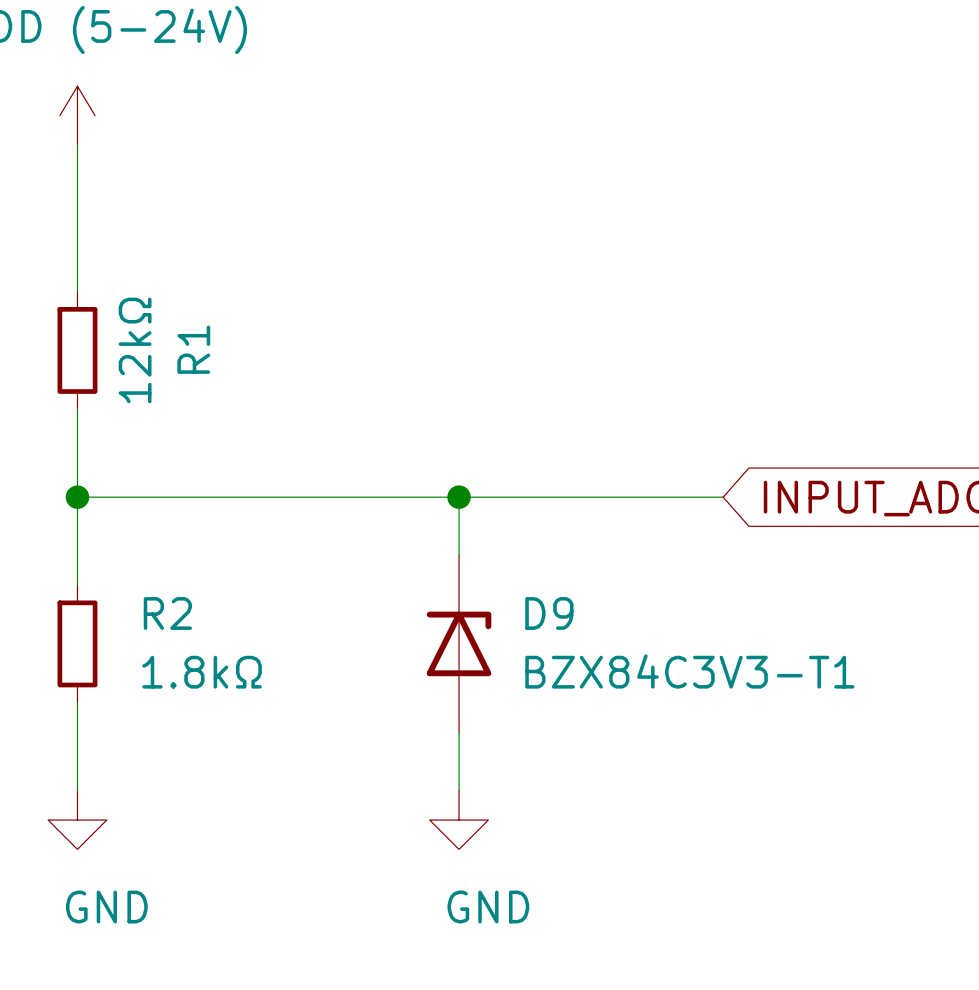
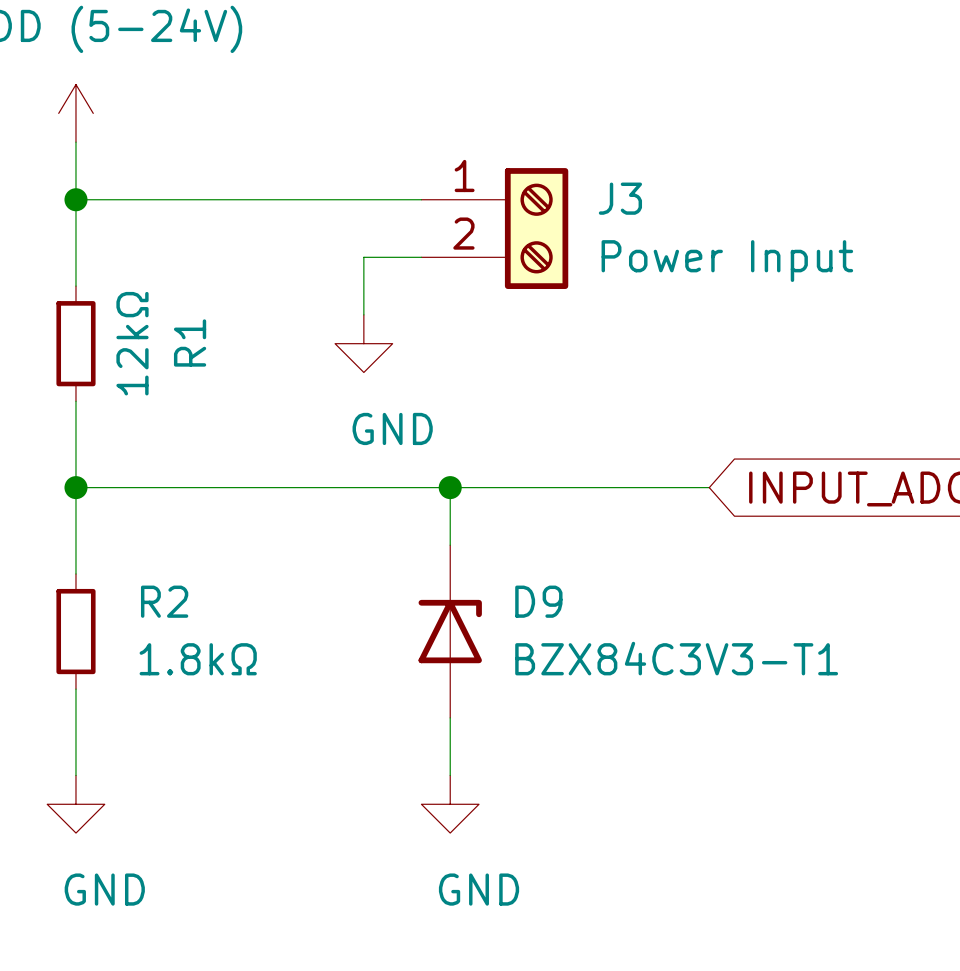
wire: none -> (75, 199) (421, 199)
junction: none -> (75, 199)
J3: none -> Power Input (494, 228)
wire: none -> (421, 257) (363, 257) (363, 314)
power symbol: none -> GND (363, 343)

